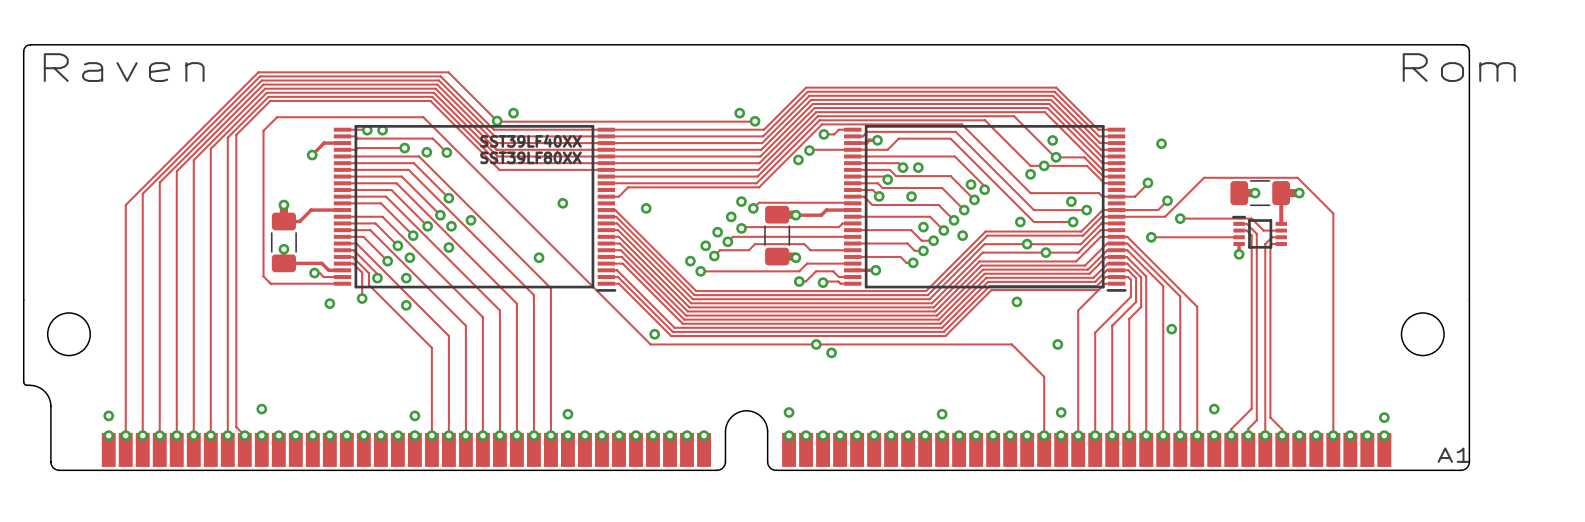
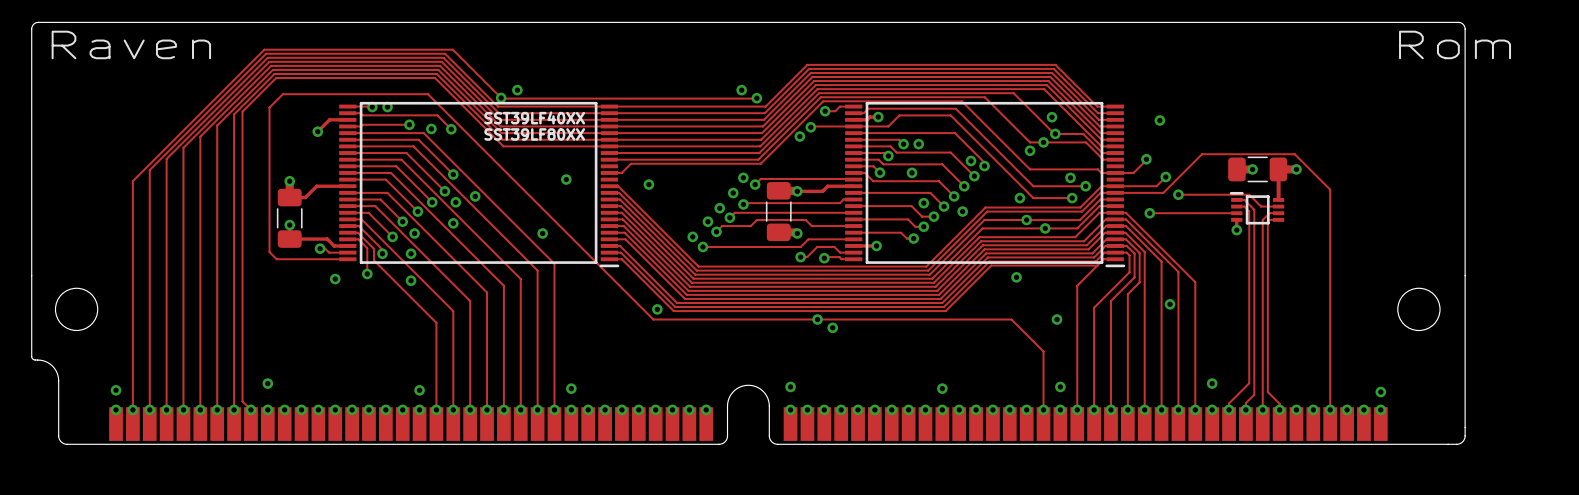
text: A1 (1453, 455) -> none

